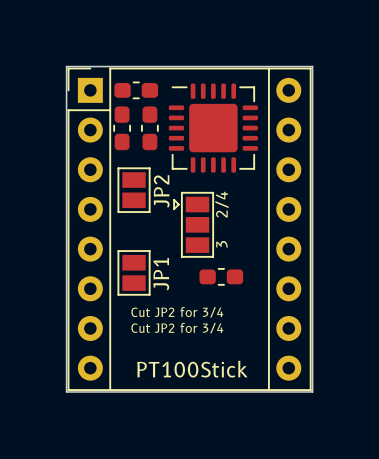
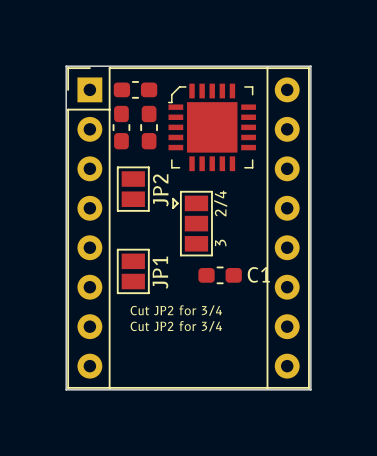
part footprint: [168, 83, 258, 173] -> [167, 83, 256, 172]
C1 name: none -> C1 (258, 274)
text: PT100Stick (192, 369) -> none

